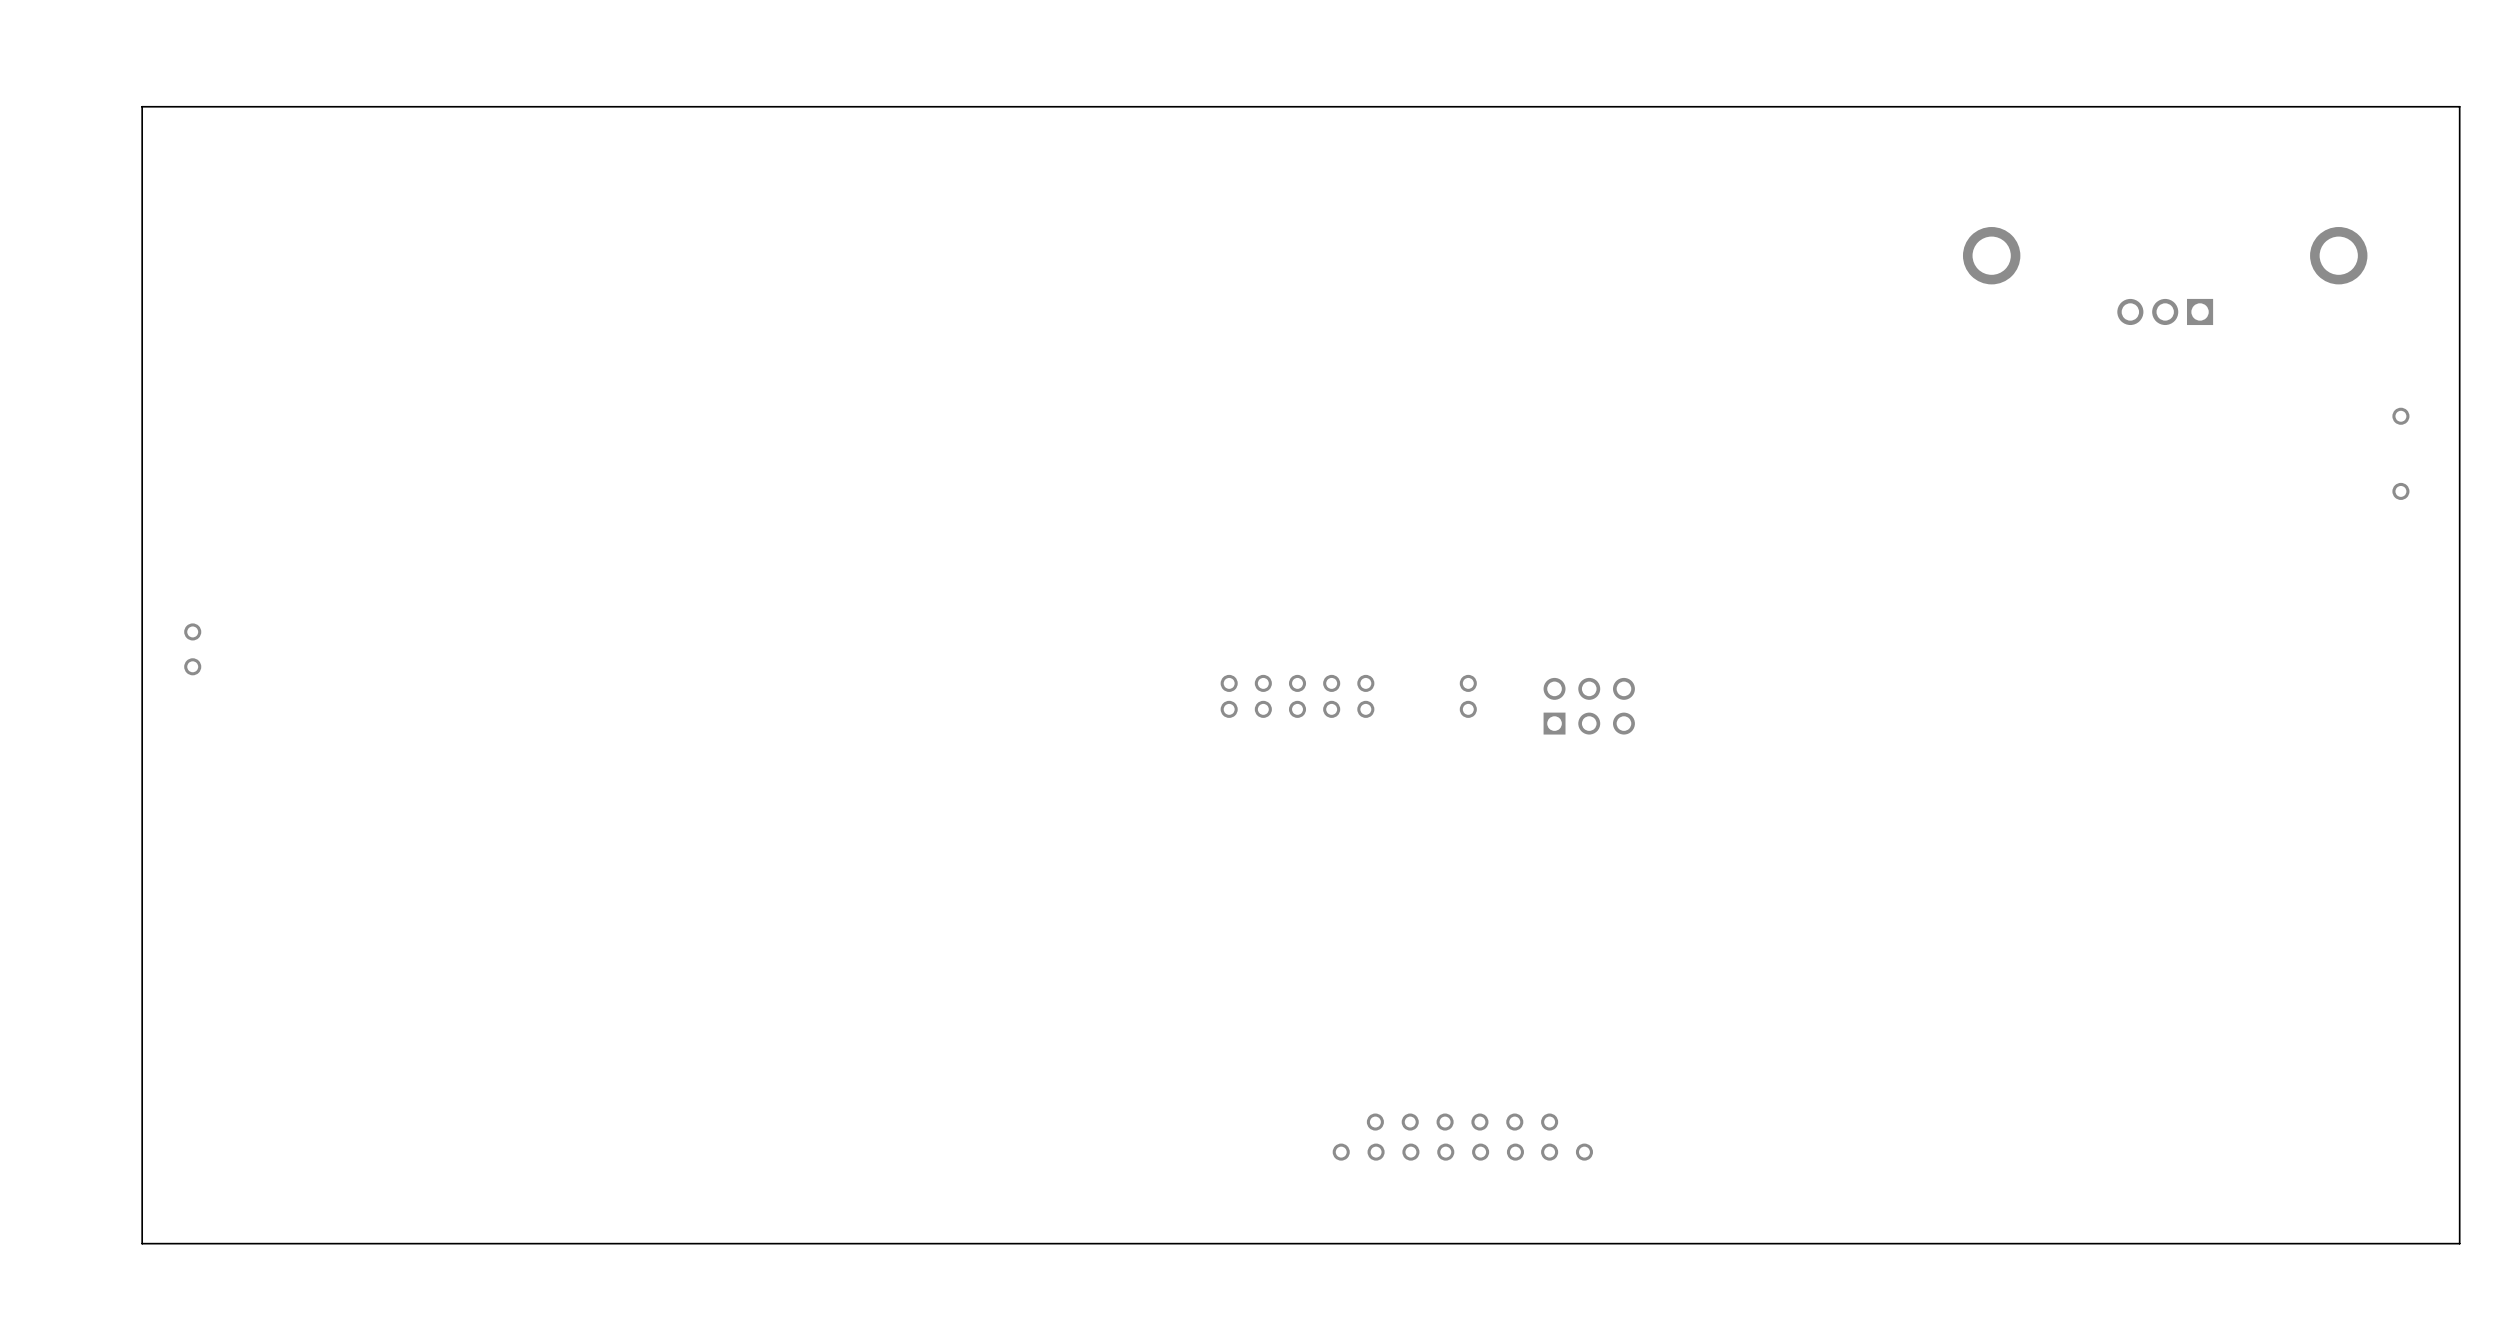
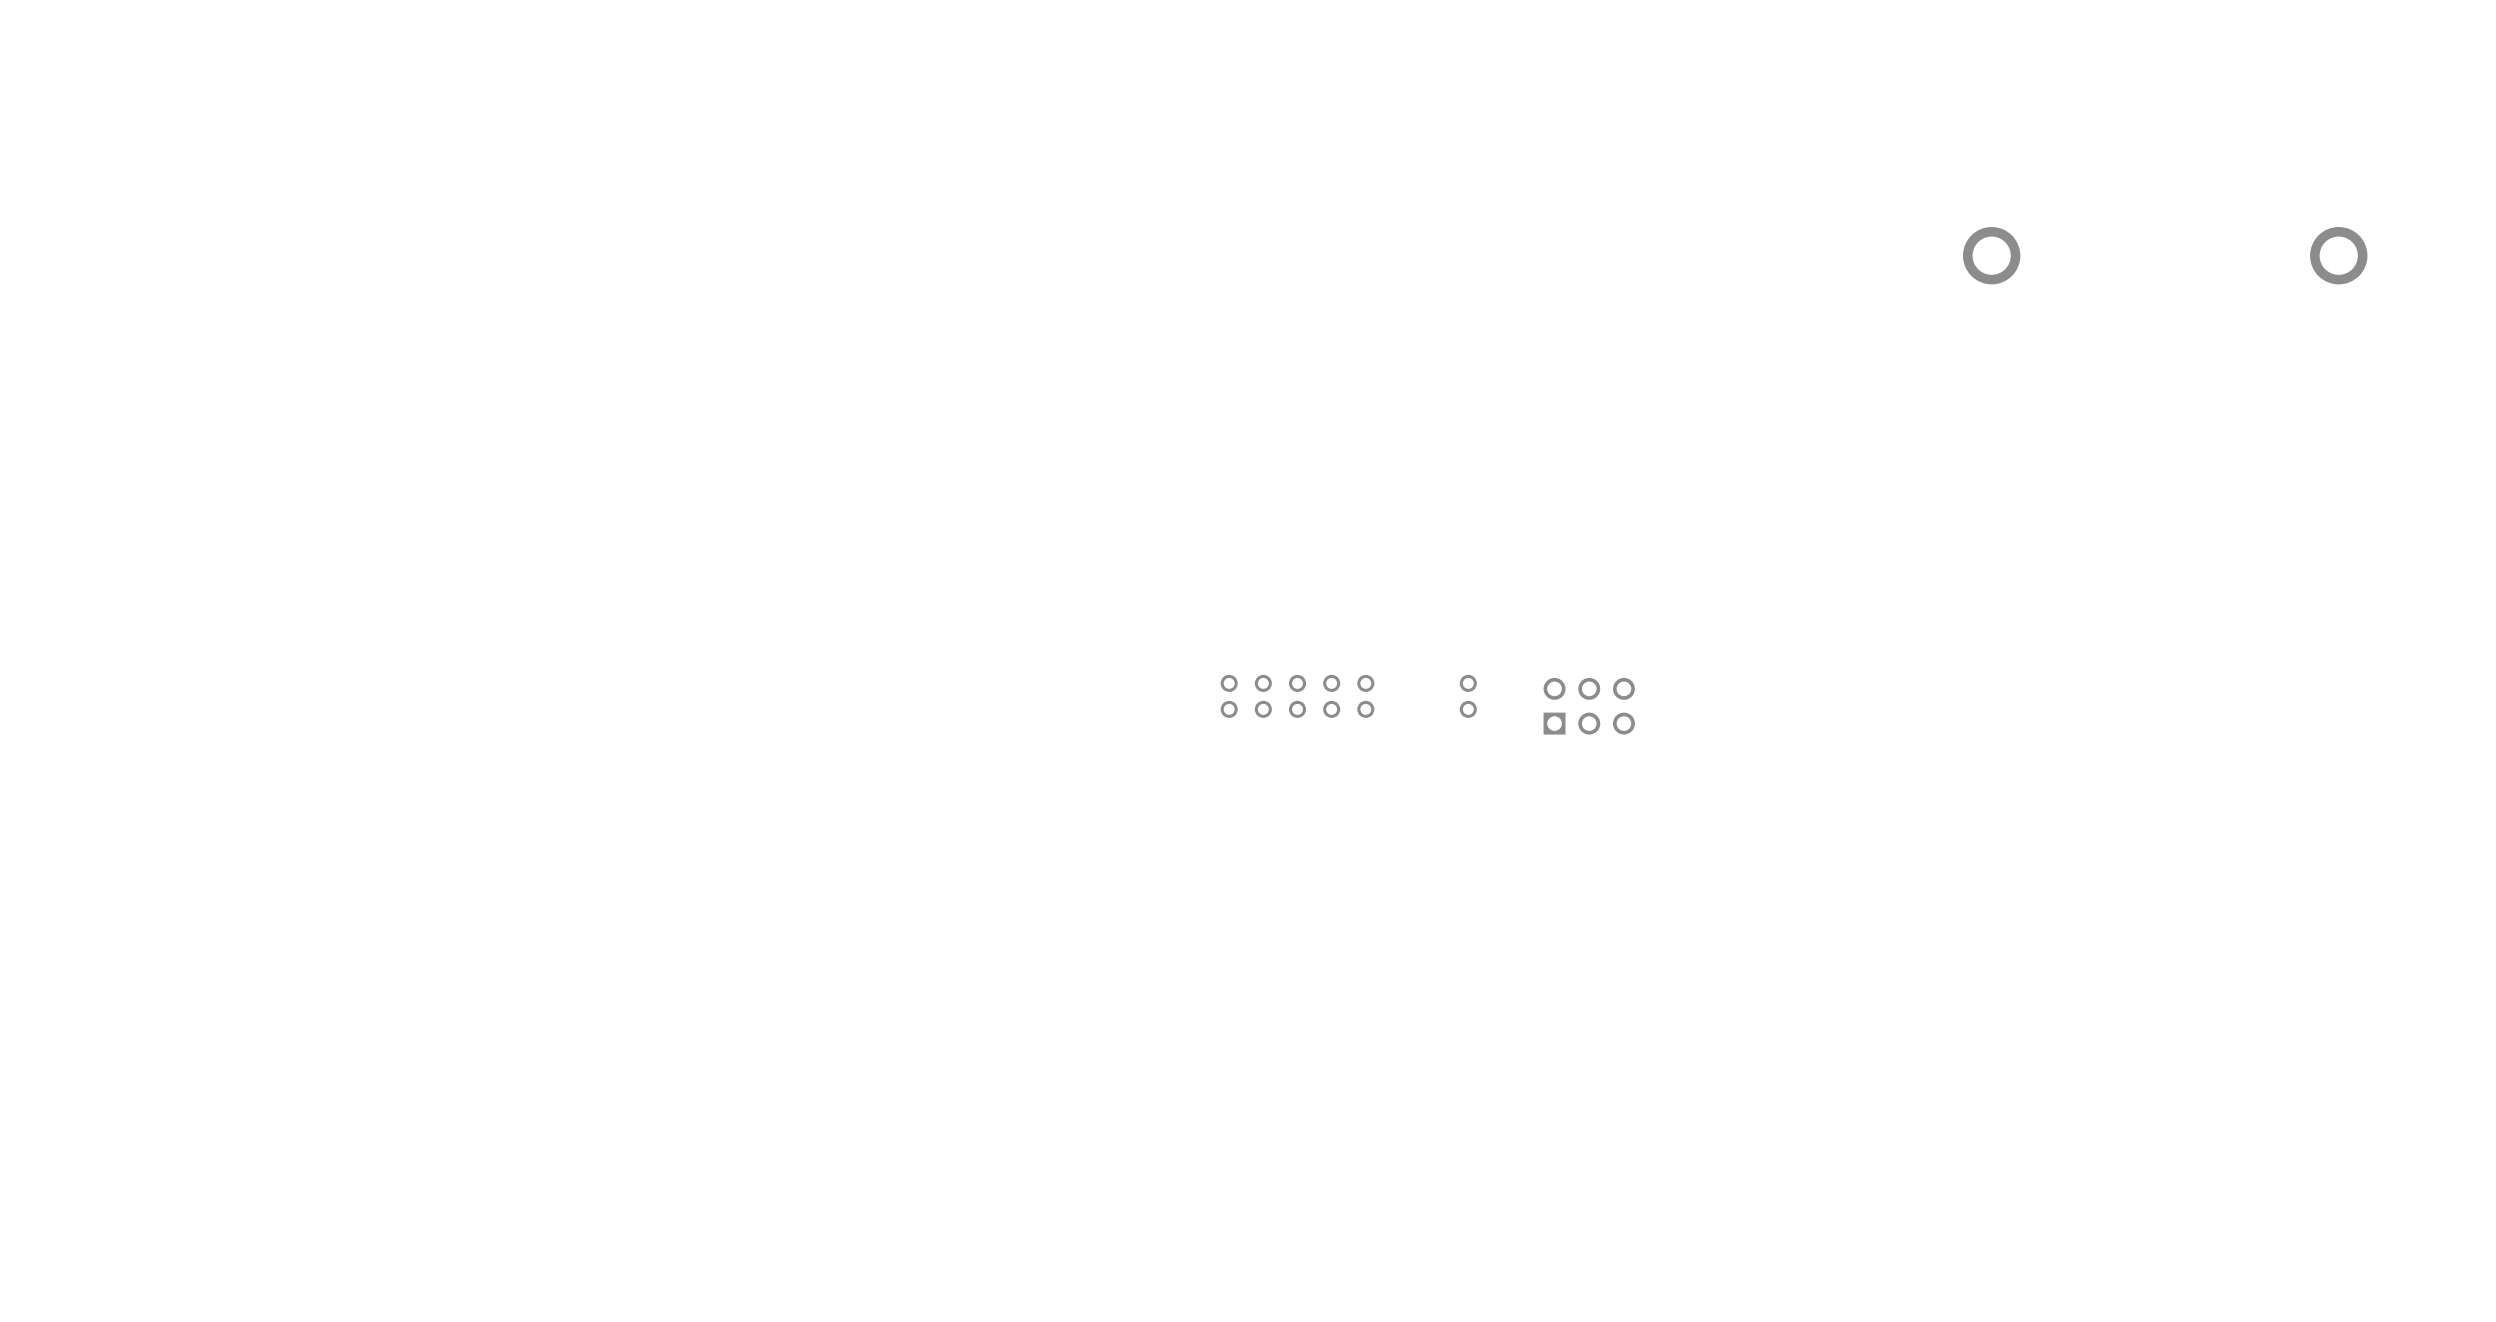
board edge: (2459, 106) (142, 106) (142, 1243) (2459, 1243) (2459, 106) -> none
part: (2165, 311) -> none
part: (2400, 416) -> none
part: (2400, 491) -> none
part: (192, 631) -> none
part: (192, 666) -> none
part: (1375, 1122) -> none
part: (1410, 1122) -> none
part: (1445, 1122) -> none
part: (1479, 1122) -> none
part: (1514, 1122) -> none
part: (1549, 1122) -> none
part: (1341, 1152) -> none
part: (1376, 1152) -> none
part: (1410, 1152) -> none
part: (1445, 1152) -> none
part: (1480, 1152) -> none
part: (1515, 1152) -> none
part: (1549, 1152) -> none
part: (1584, 1152) -> none

